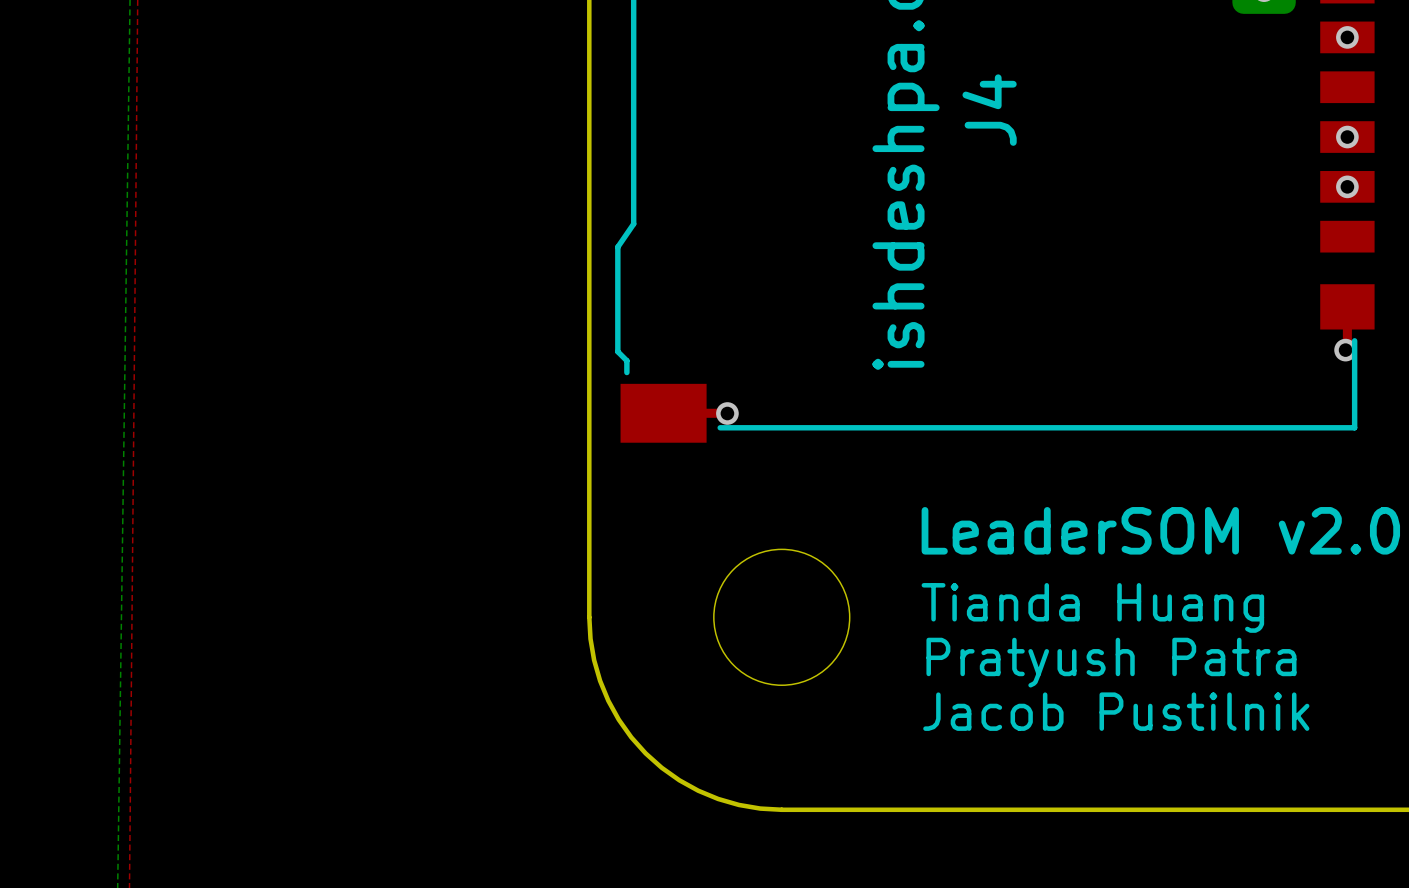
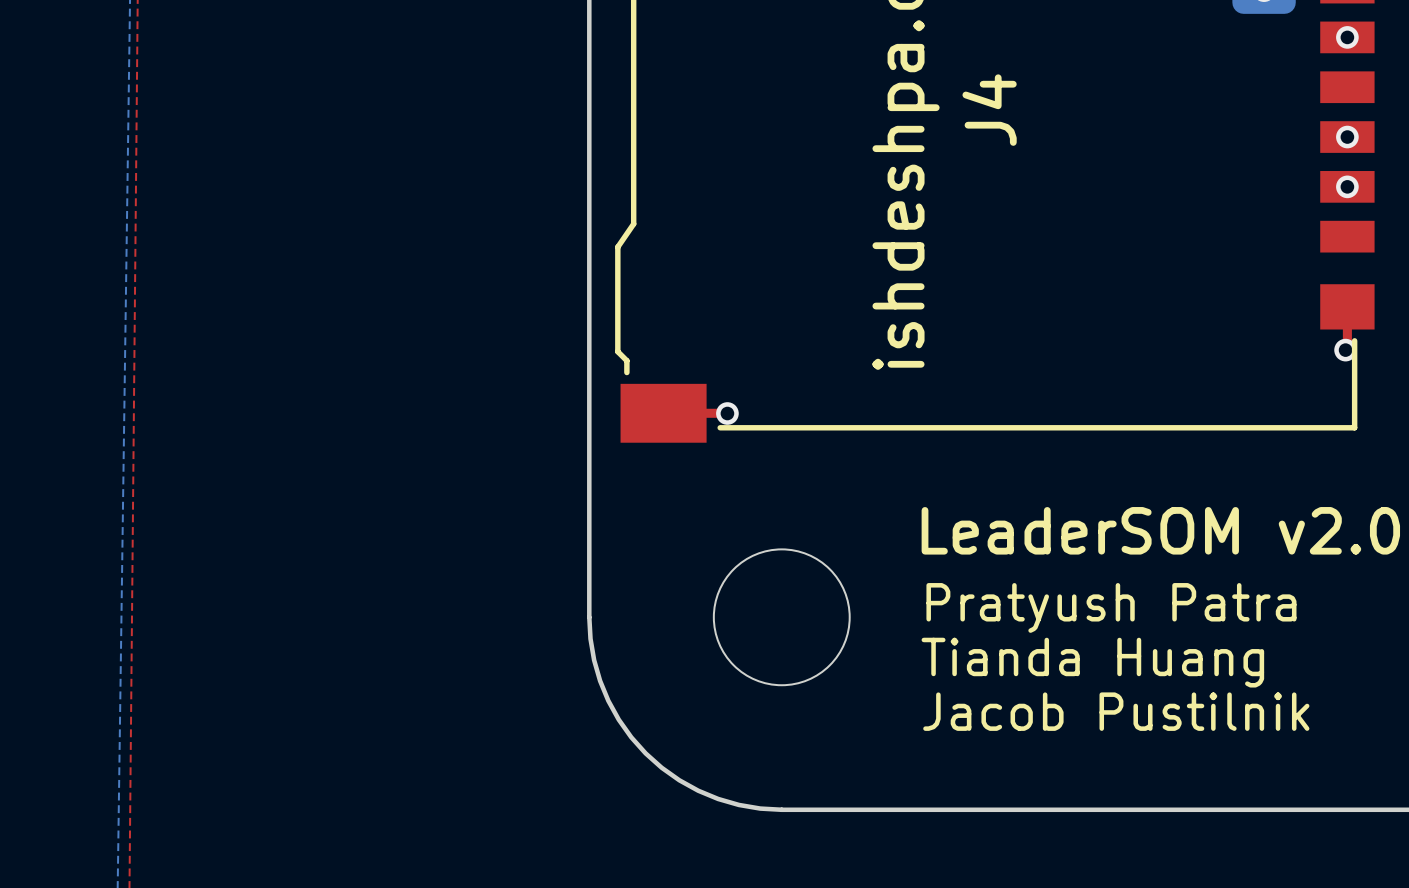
text: Tianda Huang (1092, 607) -> Pratyush Patra (1111, 607)
text: Pratyush Patra (1111, 662) -> Tianda Huang (1092, 662)

